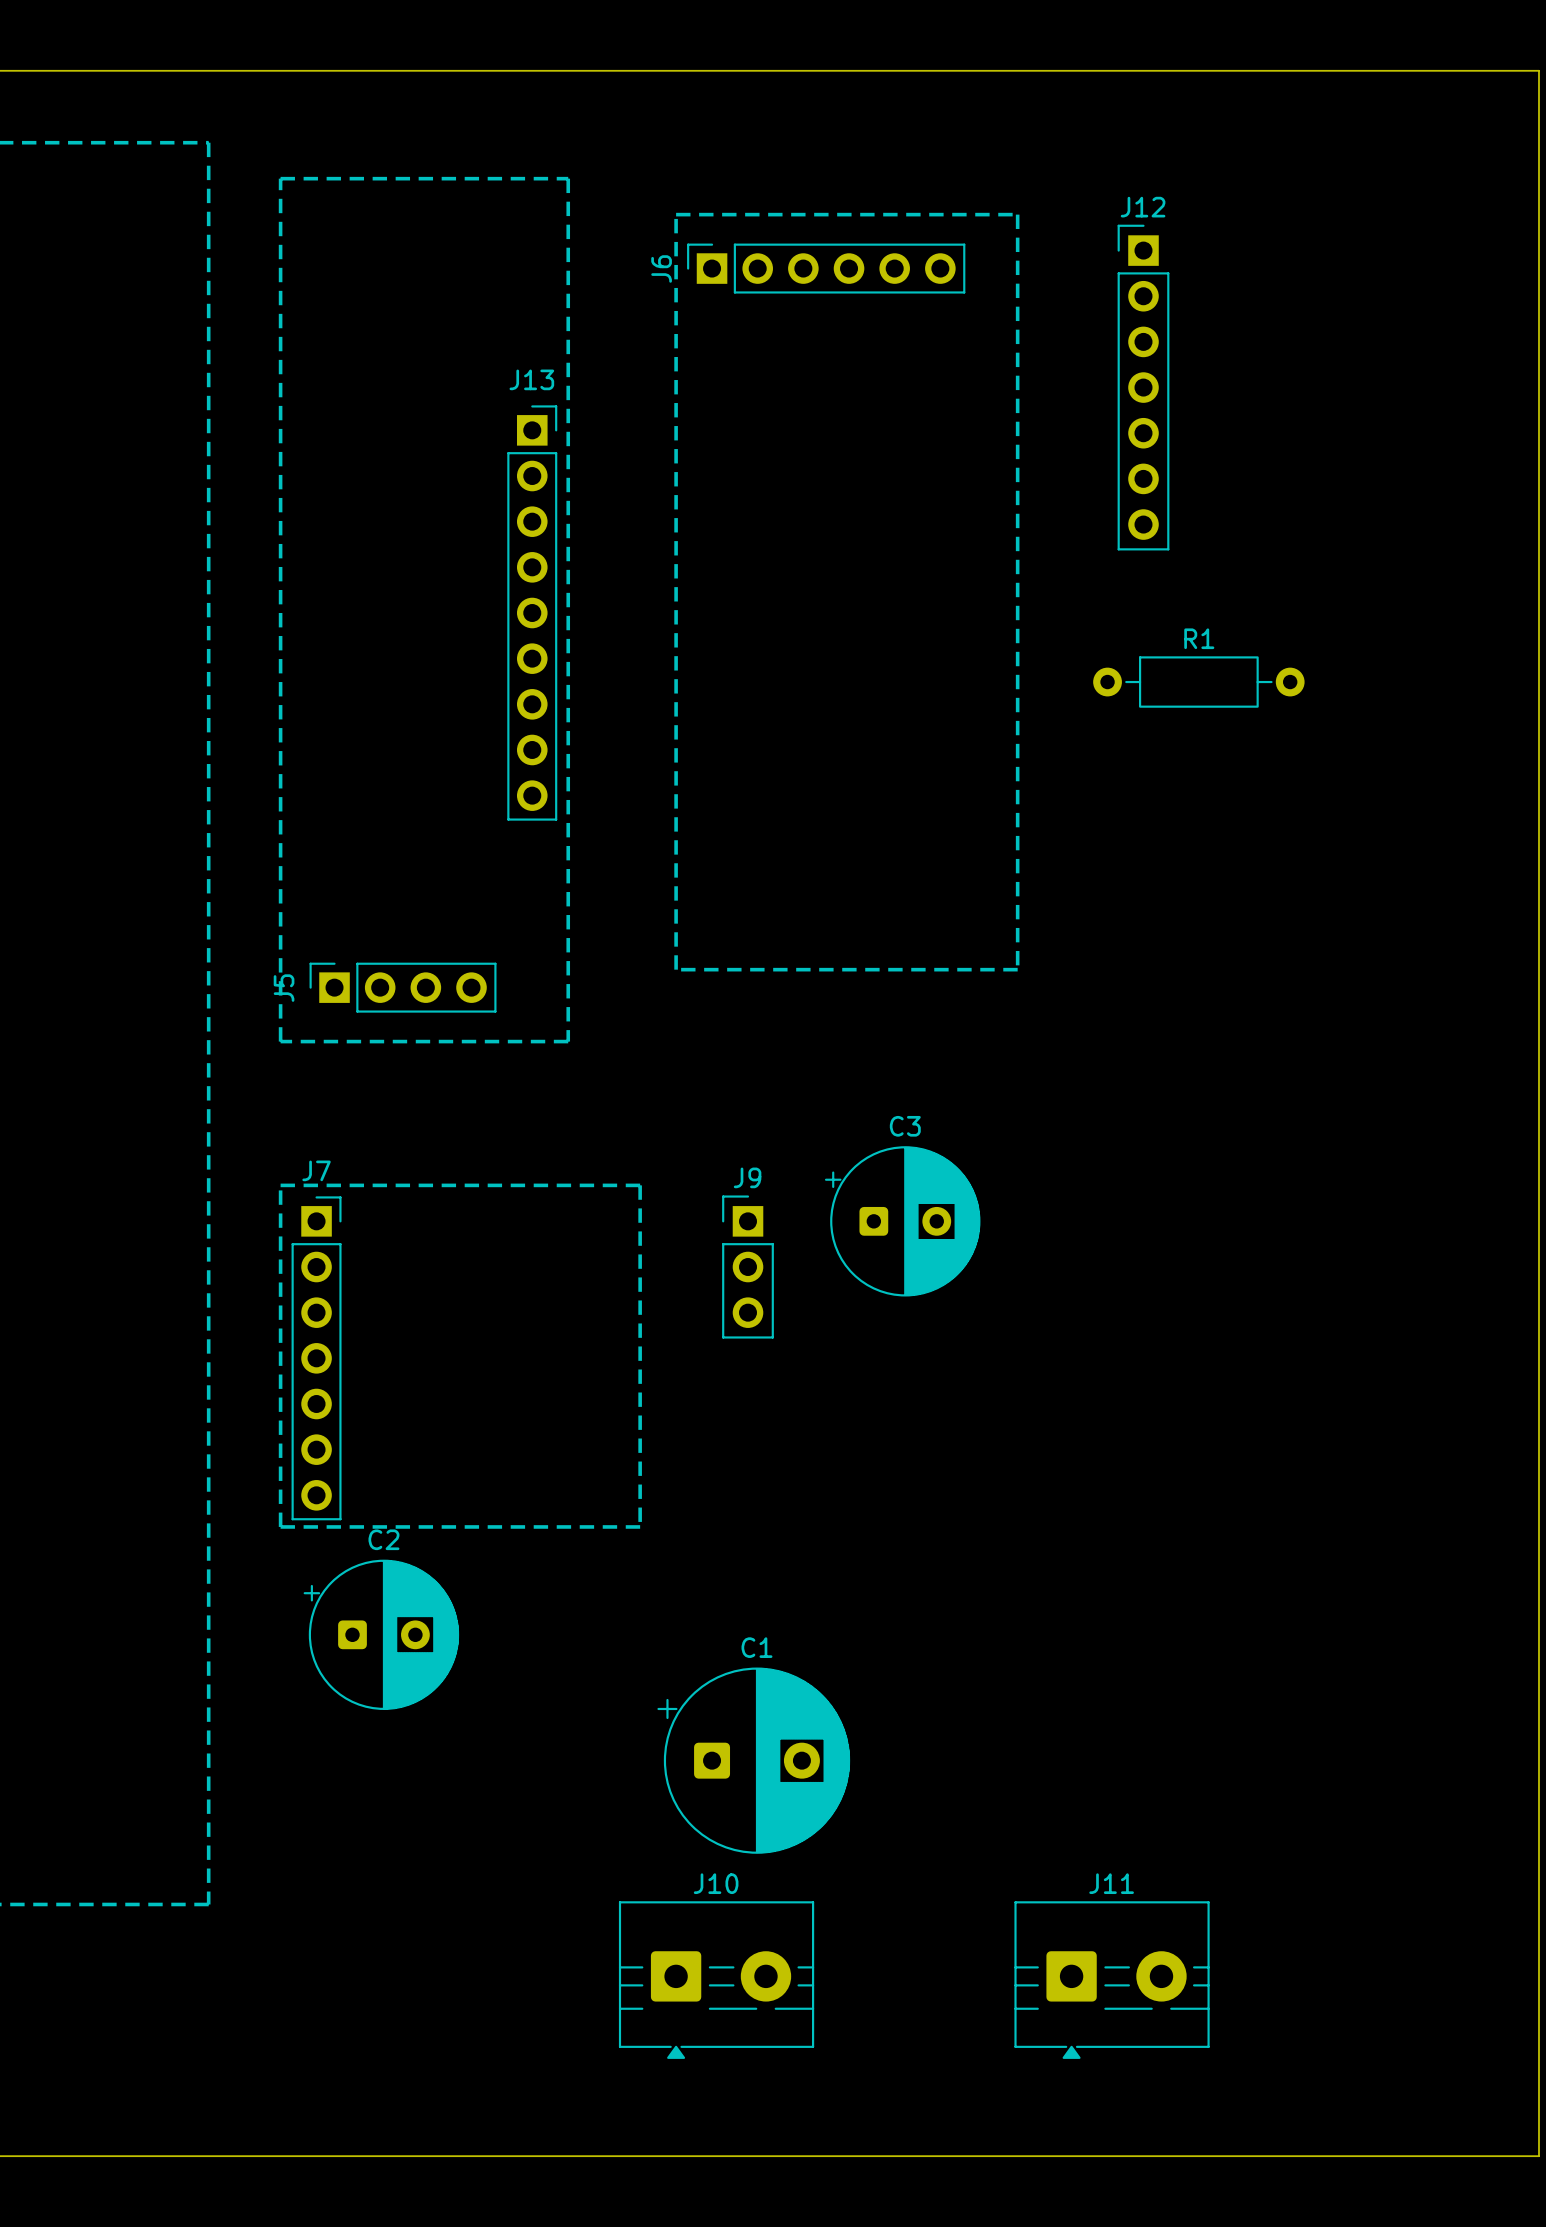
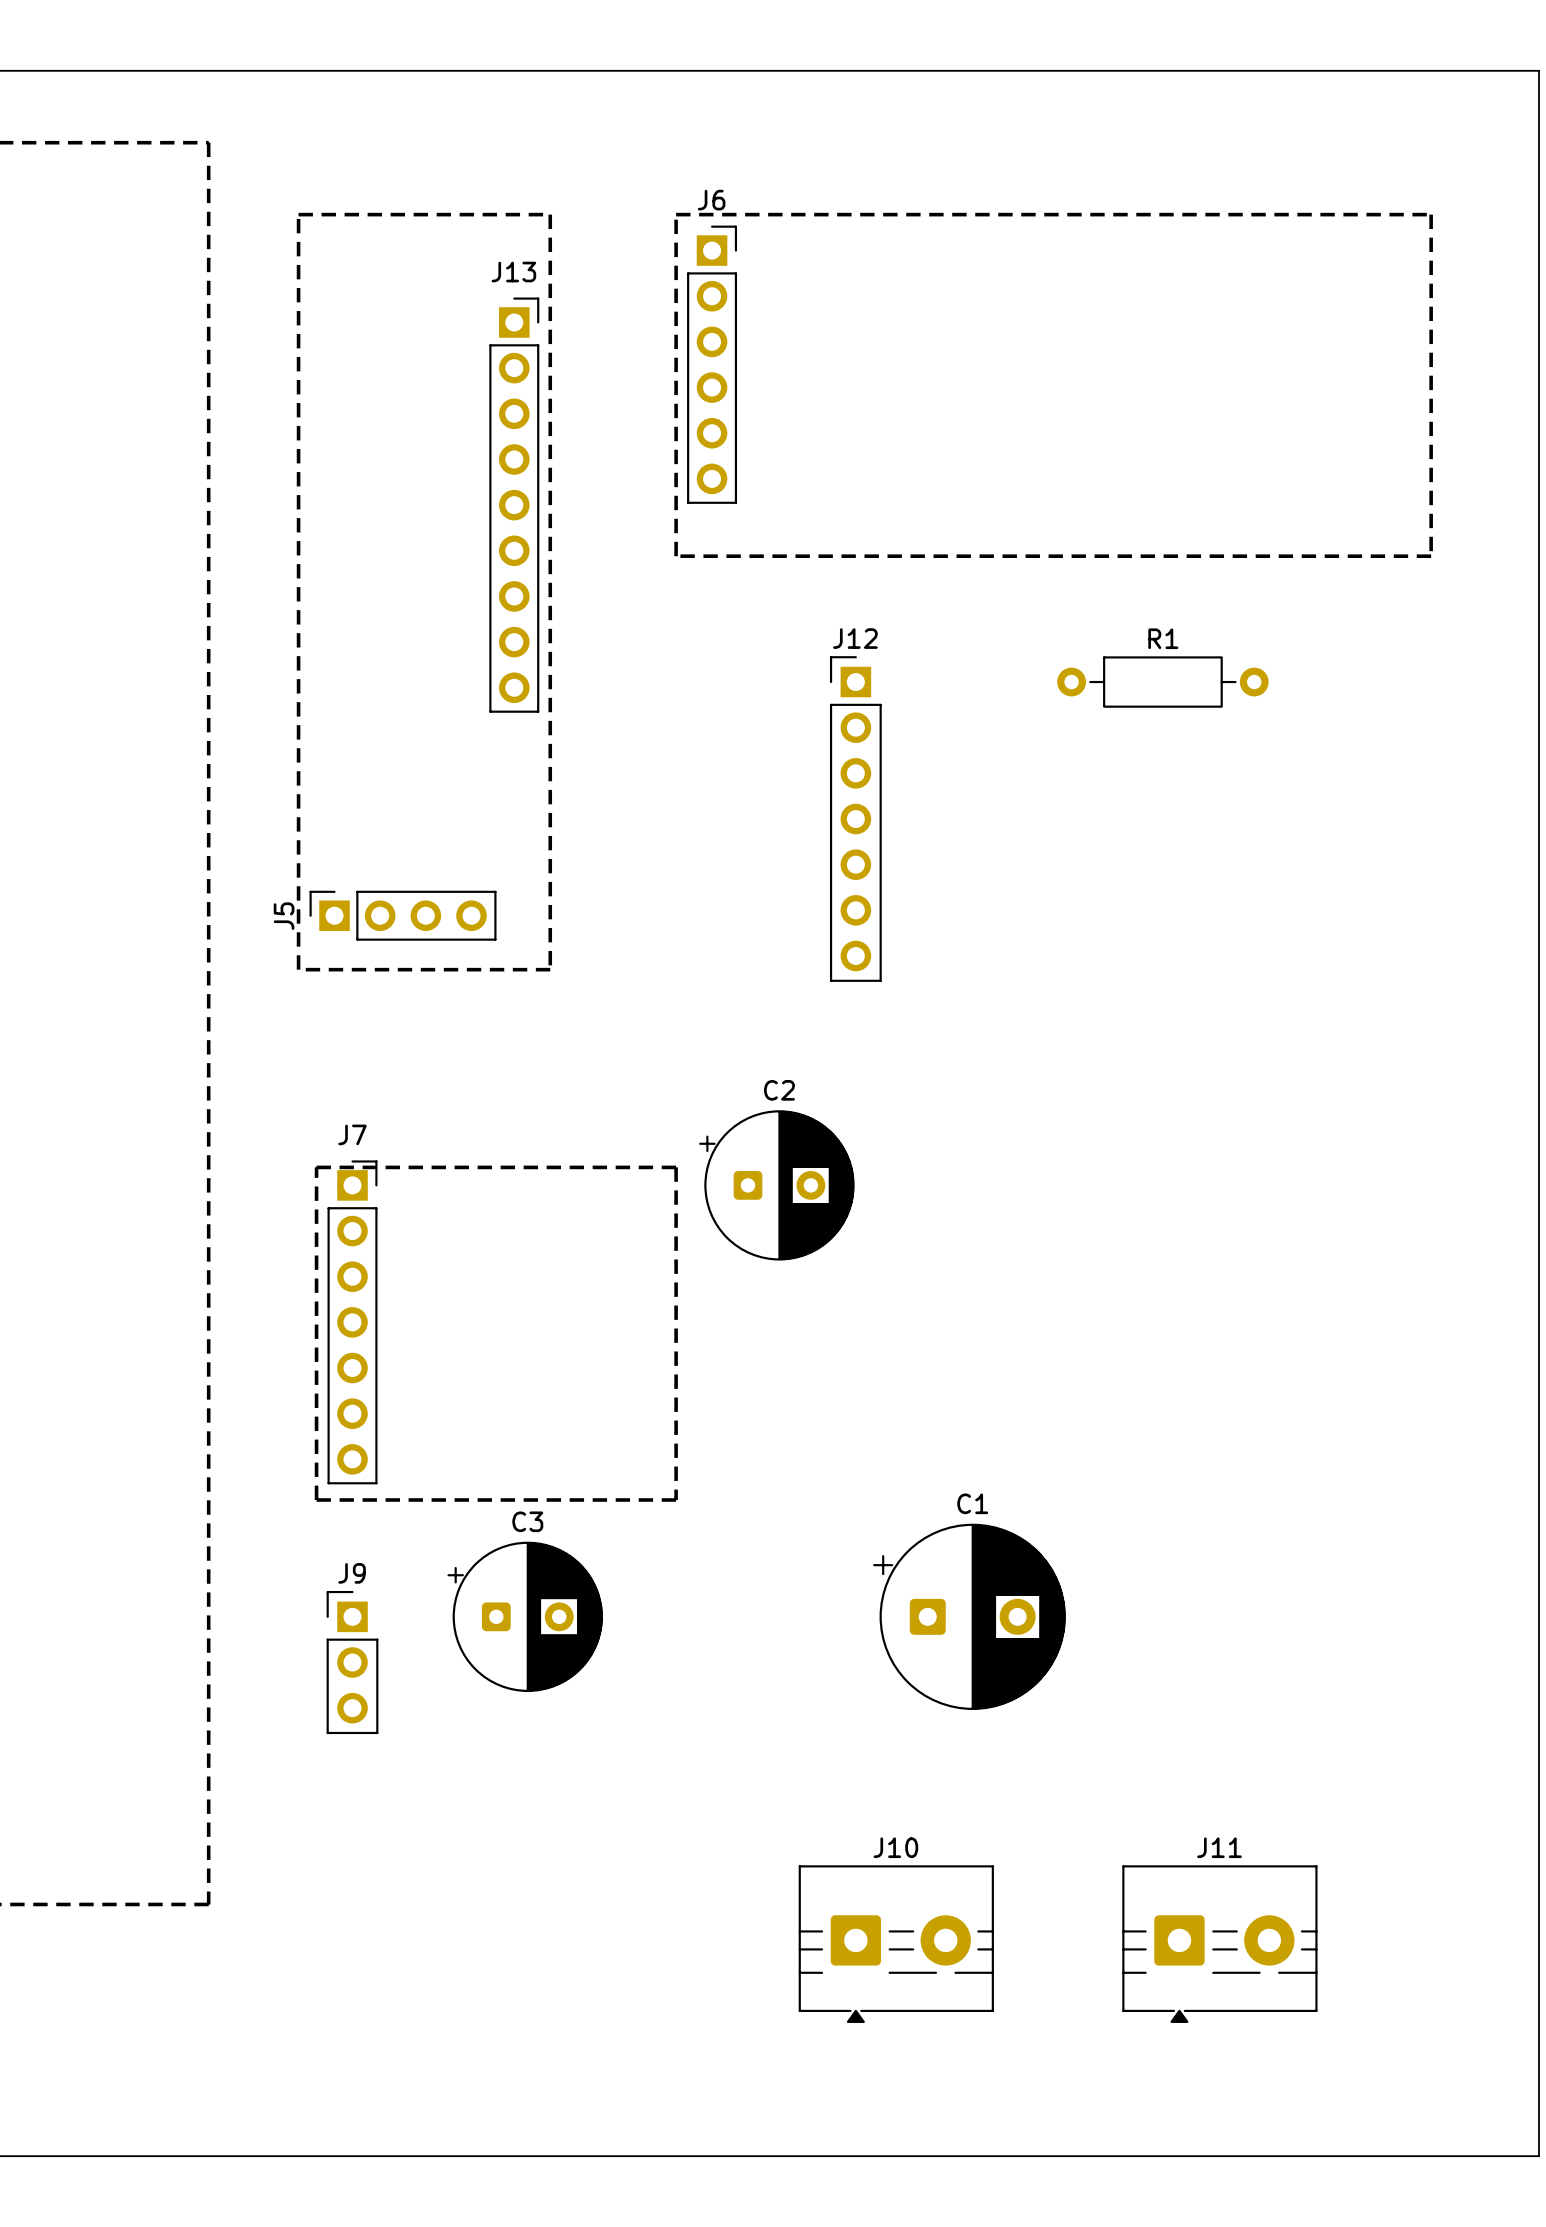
line: (280, 178) (568, 178) (568, 1041) (280, 1041) (280, 178) -> (298, 214) (298, 969) (550, 969) (550, 214) (298, 214)
line: (1017, 214) (1017, 969) (676, 969) (676, 556) -> (1017, 214) (1431, 214) (1431, 556) (676, 556)
J6 rotation: 0° (826, 268) -> 90° clockwise (712, 364)
J12 position: (1143, 387) -> (855, 819)
J13 position: (532, 613) -> (514, 505)
R1 position: (1198, 682) -> (1162, 682)
J5 position: (403, 987) -> (403, 915)
line: (280, 1185) (280, 1526) (640, 1526) (640, 1185) (280, 1185) -> (316, 1167) (316, 1499) (676, 1499) (676, 1167) (316, 1167)
C3 position: (902, 1221) -> (525, 1616)
J9 position: (748, 1267) -> (352, 1662)
J7 position: (316, 1358) -> (352, 1322)
C2 position: (381, 1634) -> (776, 1185)
C1 position: (753, 1760) -> (969, 1616)
J10 position: (716, 1980) -> (896, 1944)
J11 position: (1112, 1980) -> (1219, 1944)

